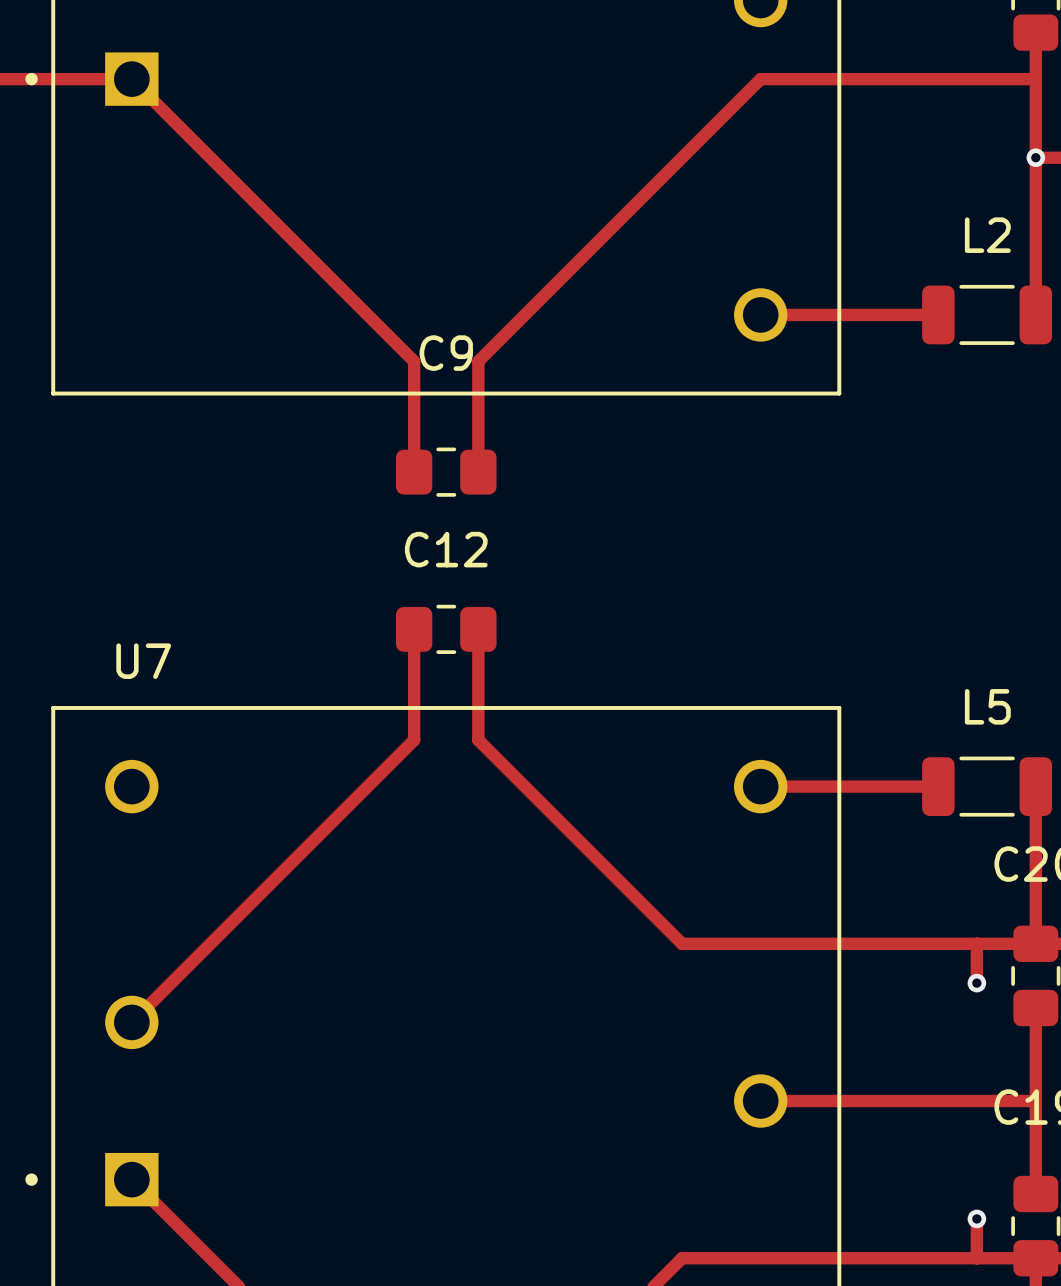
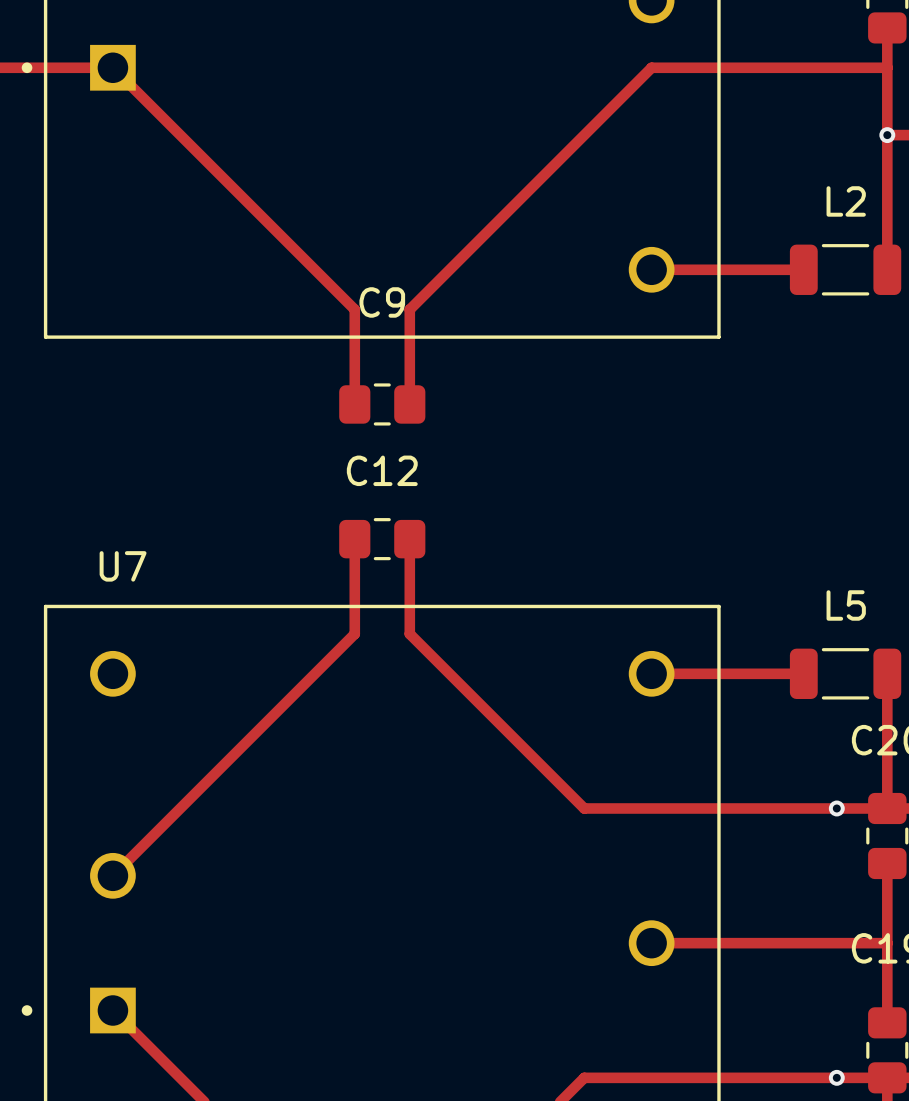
track: (976, 943) (976, 983) -> none
via position: (976, 983) -> (836, 808)
track: (976, 1218) (976, 1258) -> none
via position: (976, 1218) -> (836, 1077)

